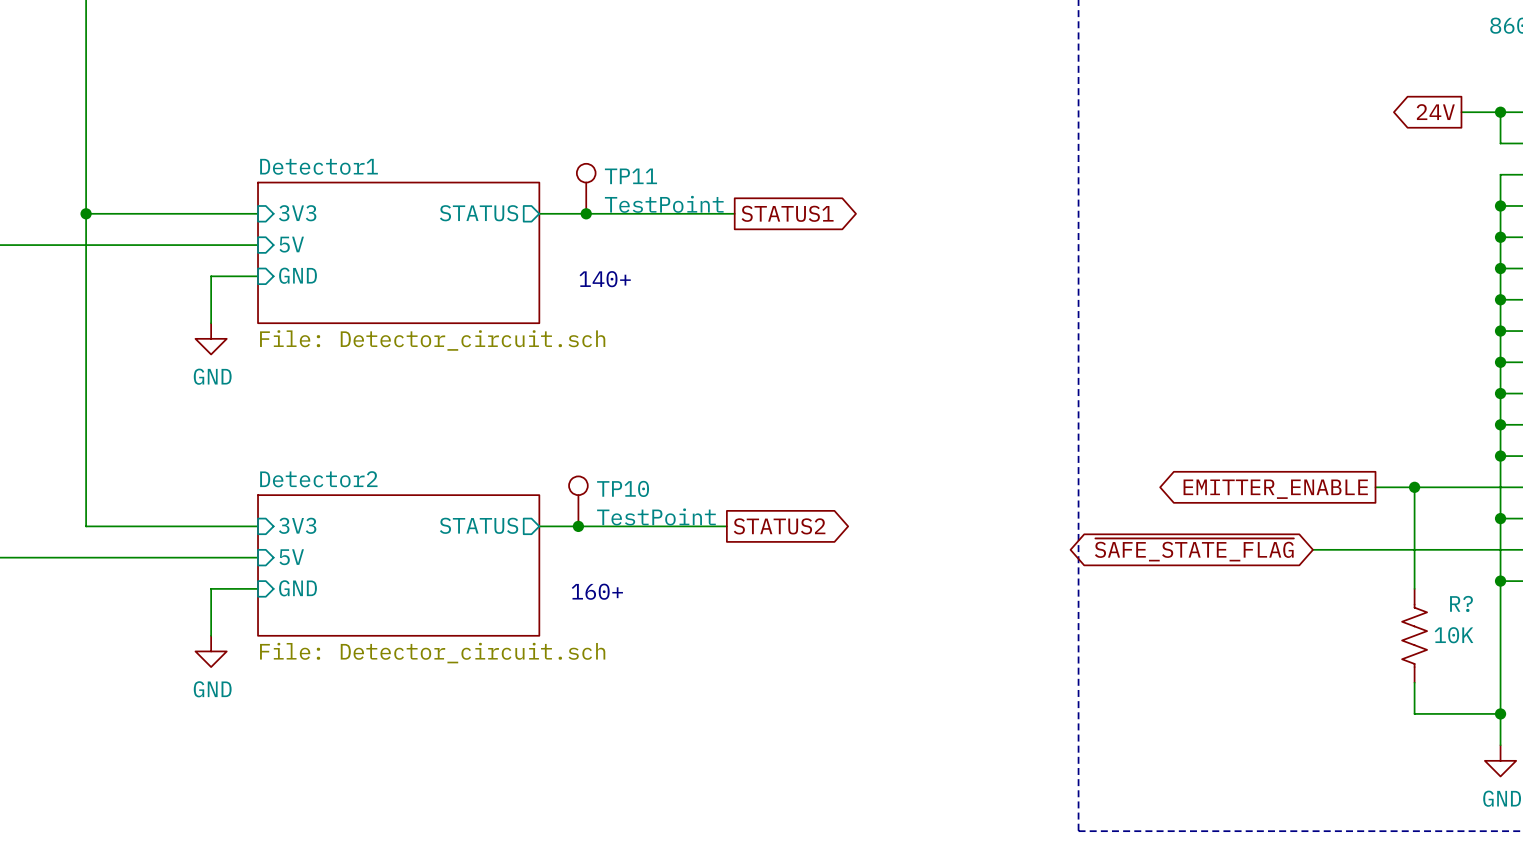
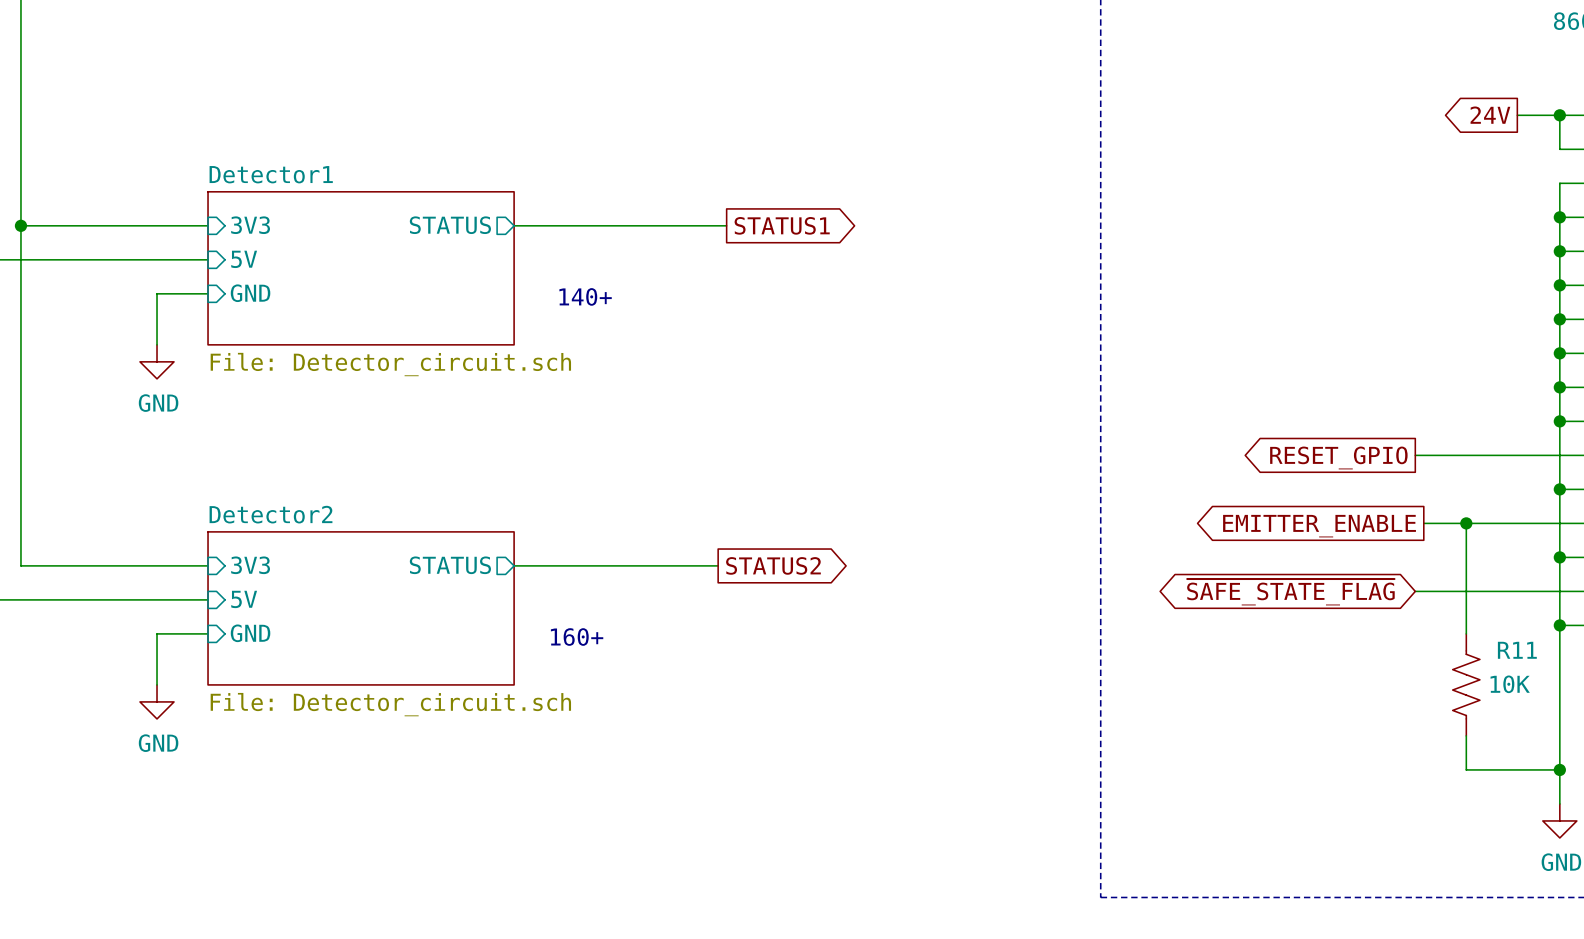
TP11: TestPoint (586, 188) -> none
junction: (586, 213) -> none
wire: none -> (1415, 455) (1559, 455)
junction: (1500, 424) -> none
global label: none -> RESET_GPIO (1338, 457)
TP10: TestPoint (578, 501) -> none
junction: (578, 526) -> none
global label position: ~{SAFE_STATE_FLAG} (1194, 549) -> ~{SAFE_STATE_FLAG} (1290, 592)
wire: (1312, 549) (1367, 549) -> none
R? name: R? (1461, 603) -> R11 (1517, 650)

